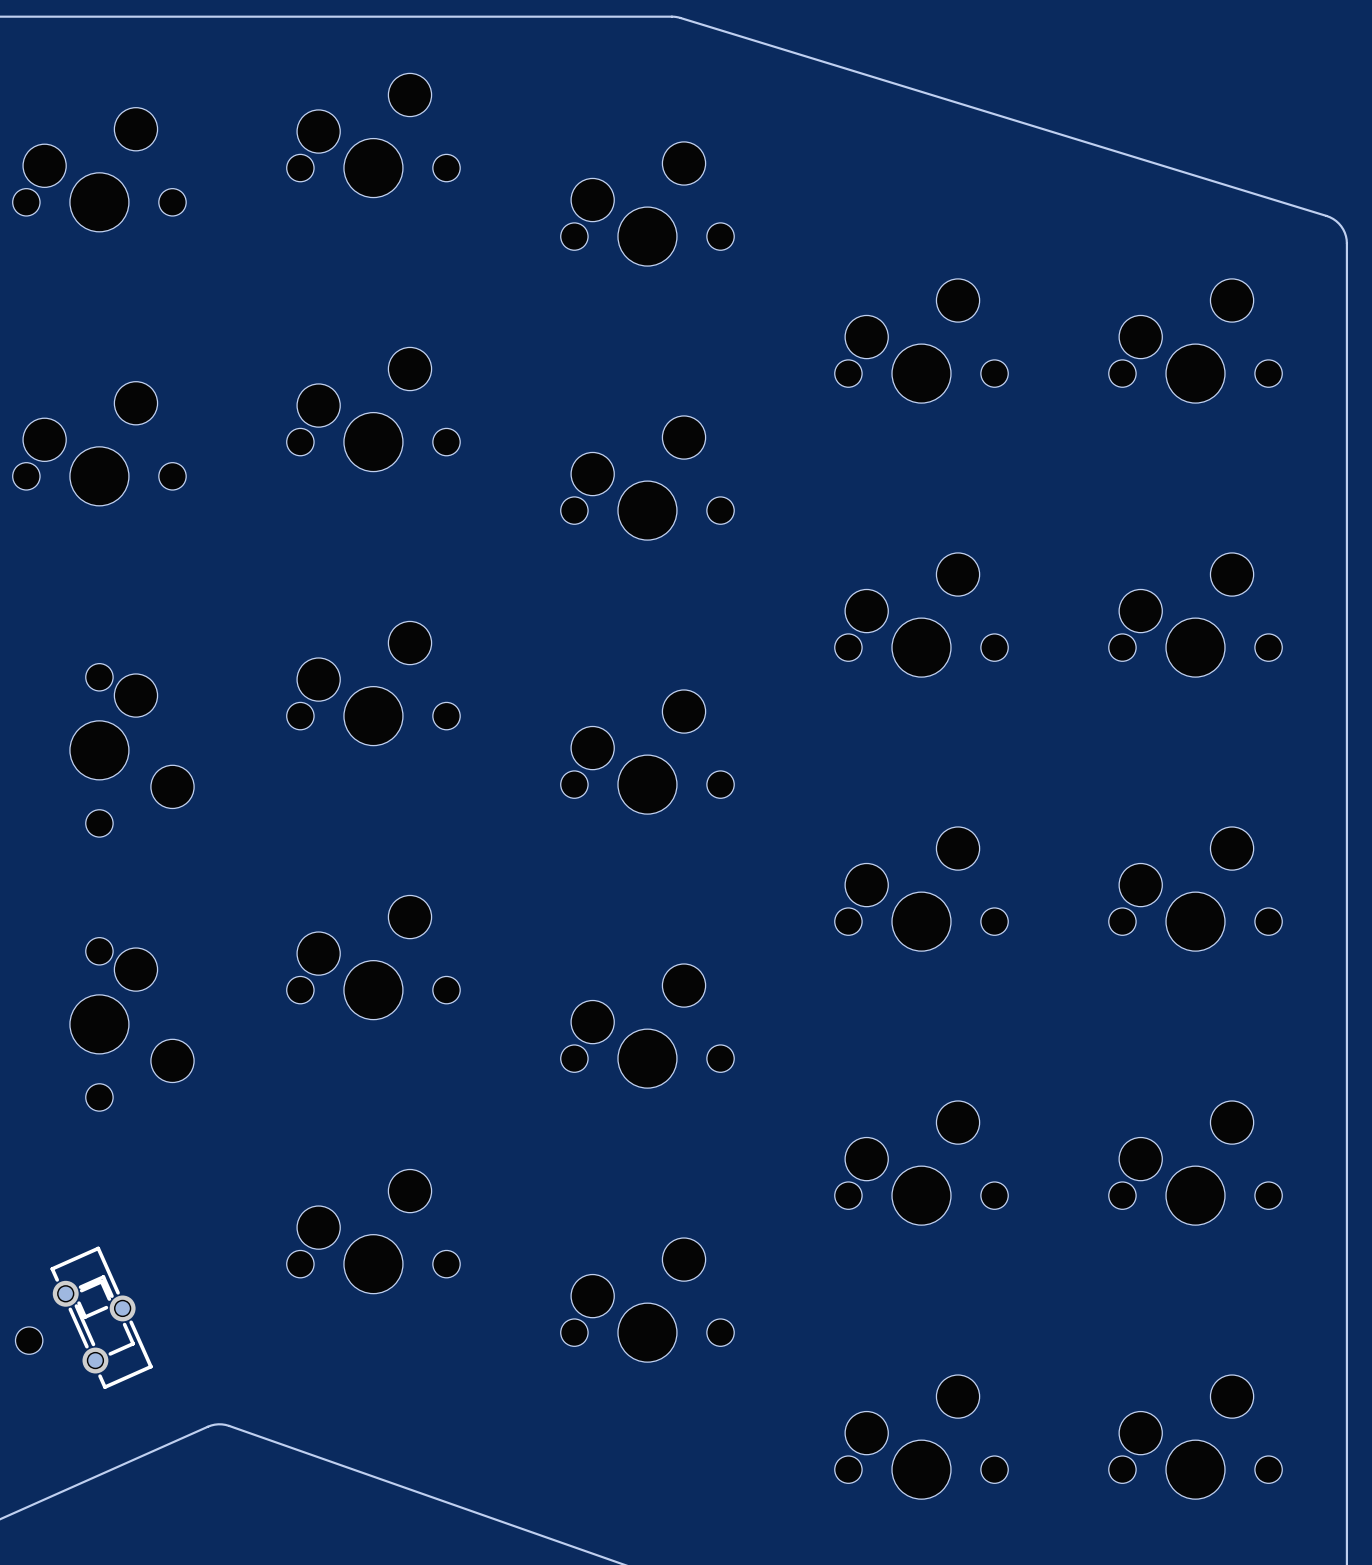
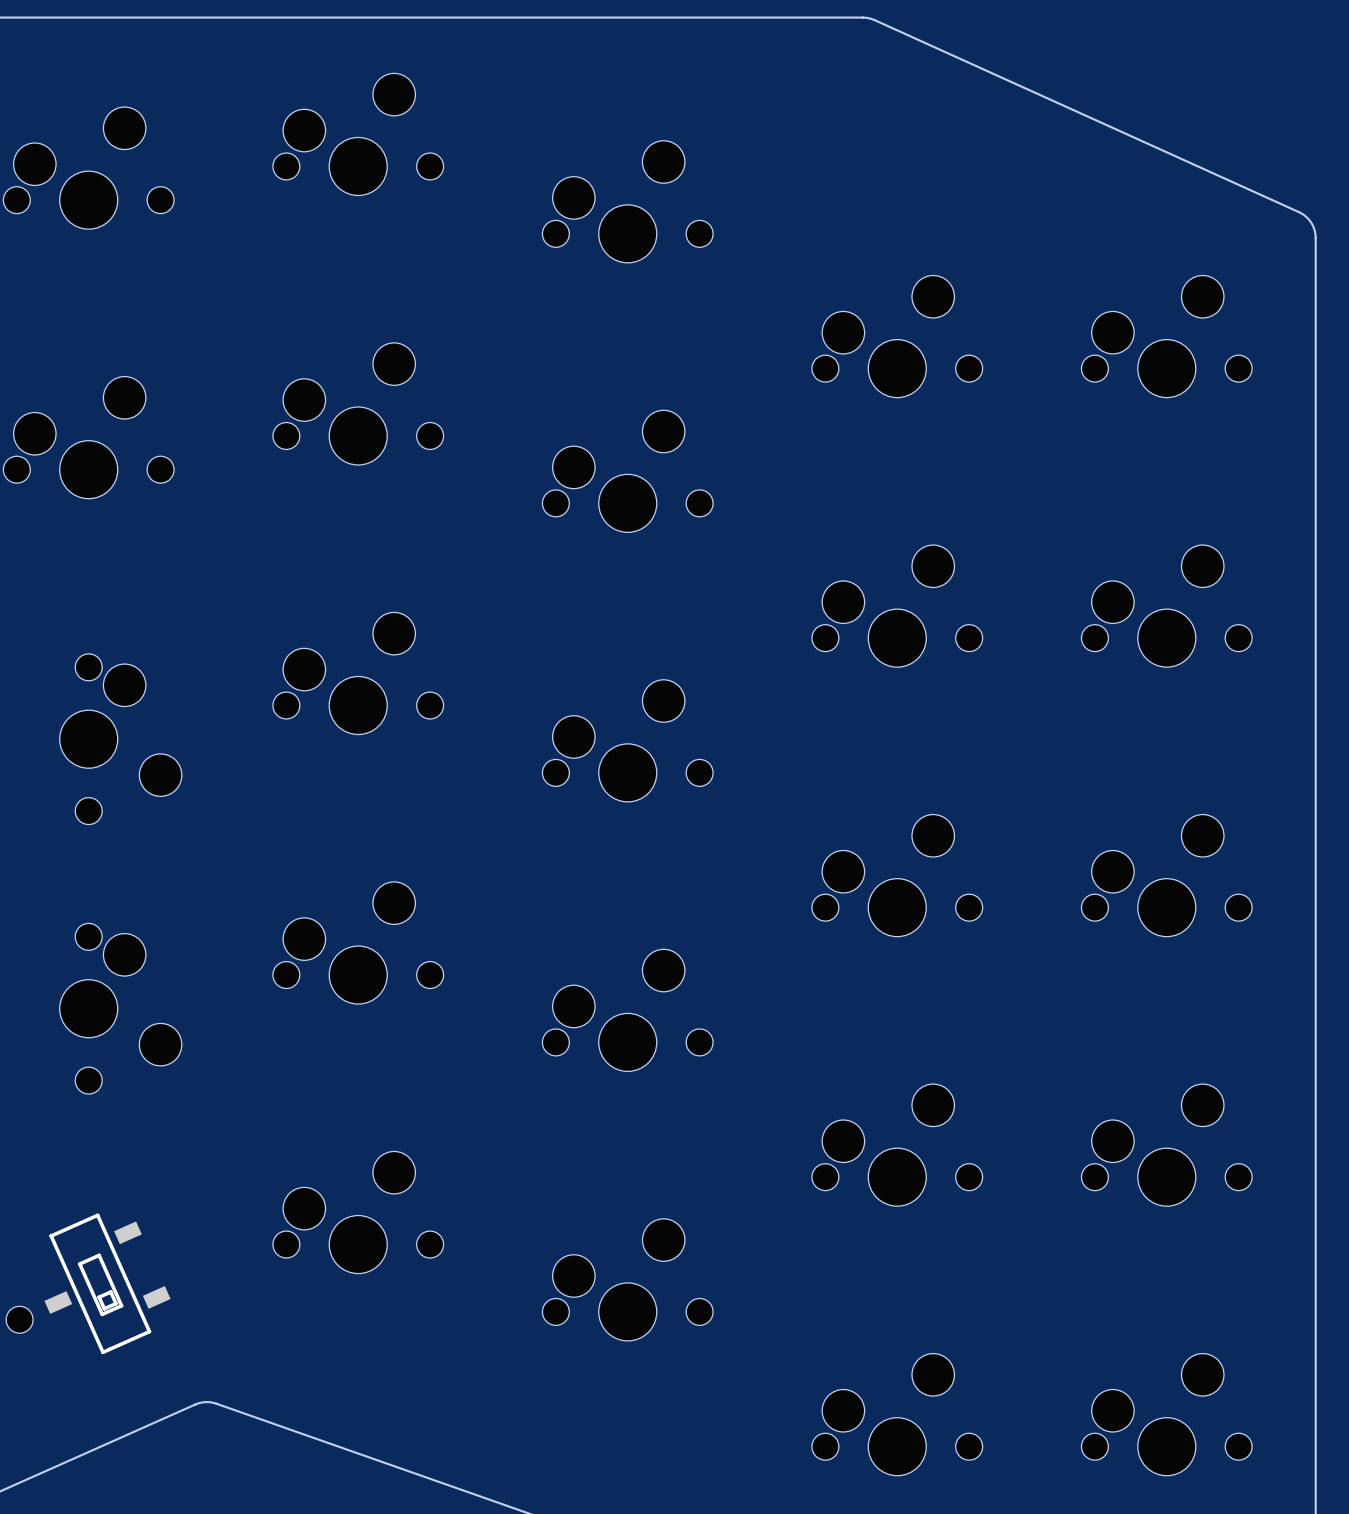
board edge: (671, 16) (1326, 215) (1341, 226) (1346, 243) -> (651, 17) (871, 18) (1299, 212) (1311, 222) (1315, 240)
part: none -> (107, 1283)
part: (101, 1317) -> none

